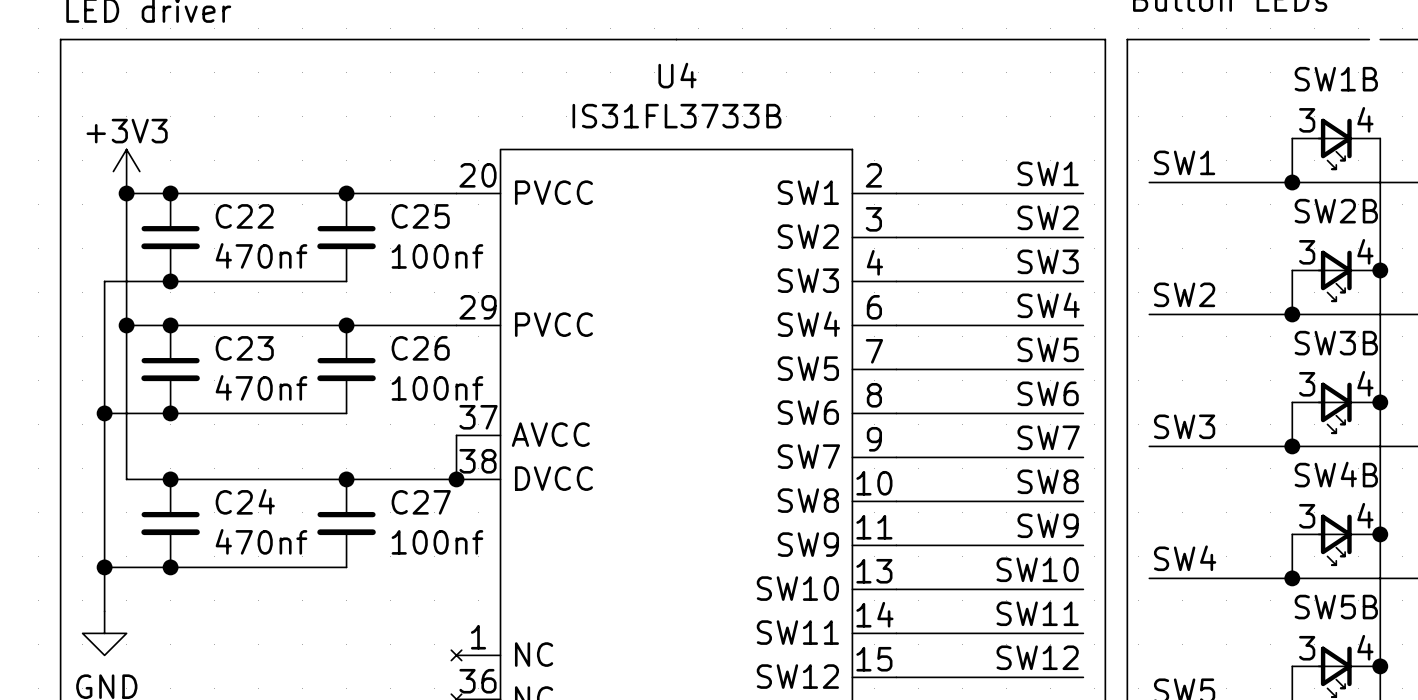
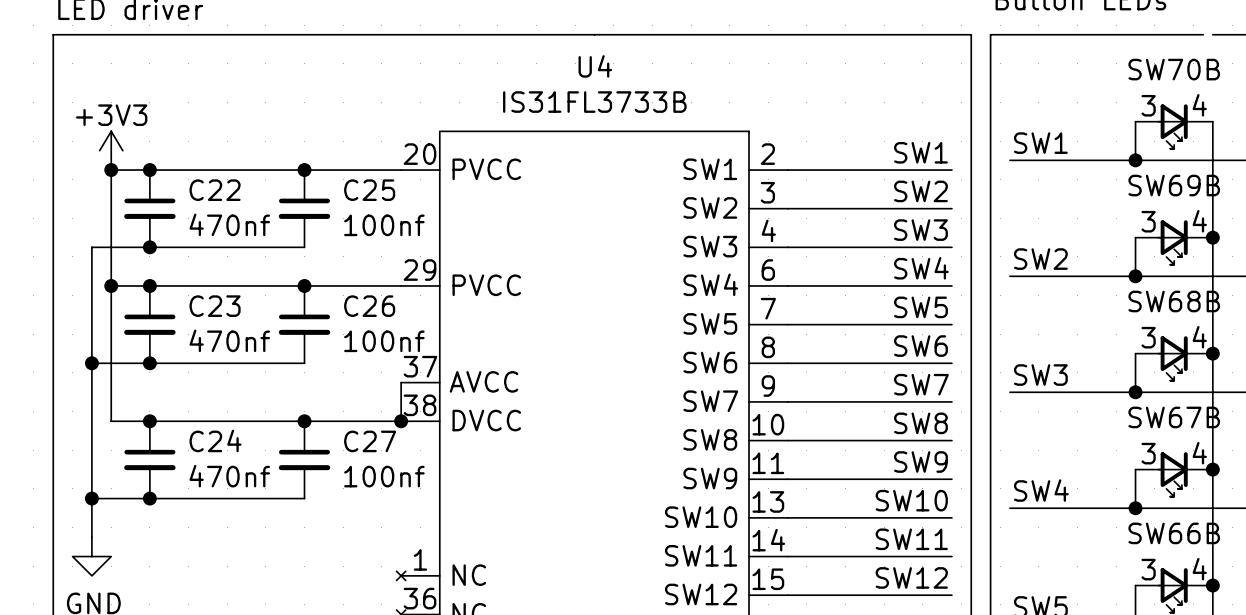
SW1B name: SW1B (1336, 79) -> SW70B (1174, 69)
SW2B name: SW2B (1336, 211) -> SW69B (1174, 185)
SW3B name: SW3B (1336, 343) -> SW68B (1174, 301)
SW4B name: SW4B (1336, 474) -> SW67B (1174, 417)
SW5B name: SW5B (1336, 607) -> SW66B (1174, 533)

